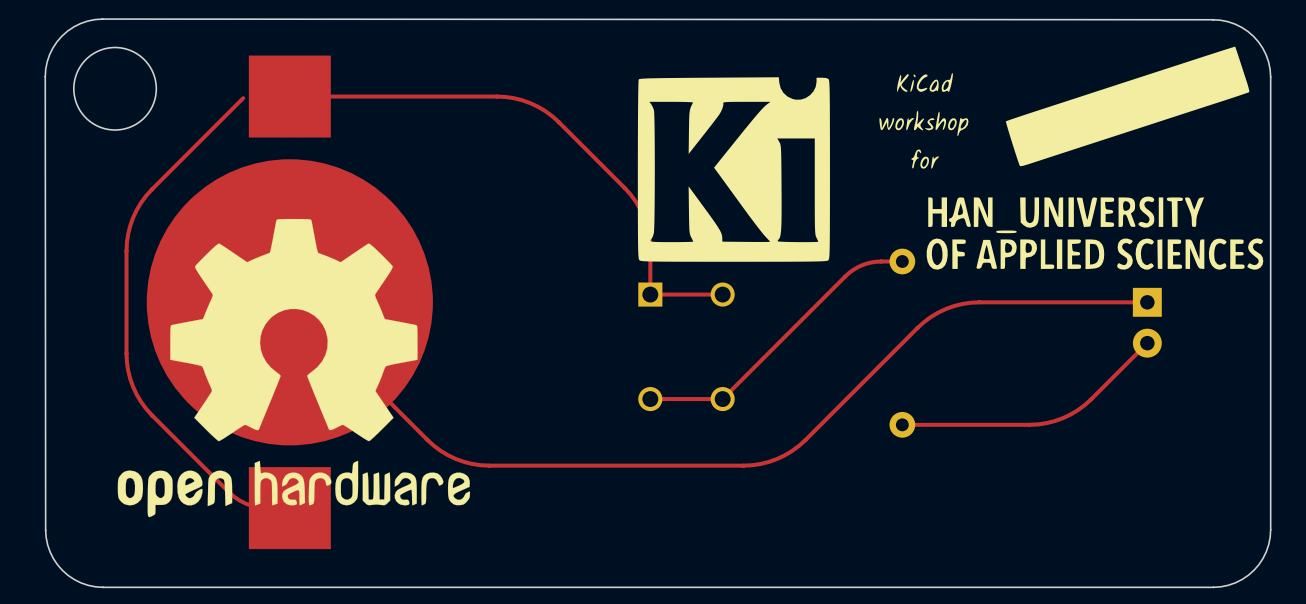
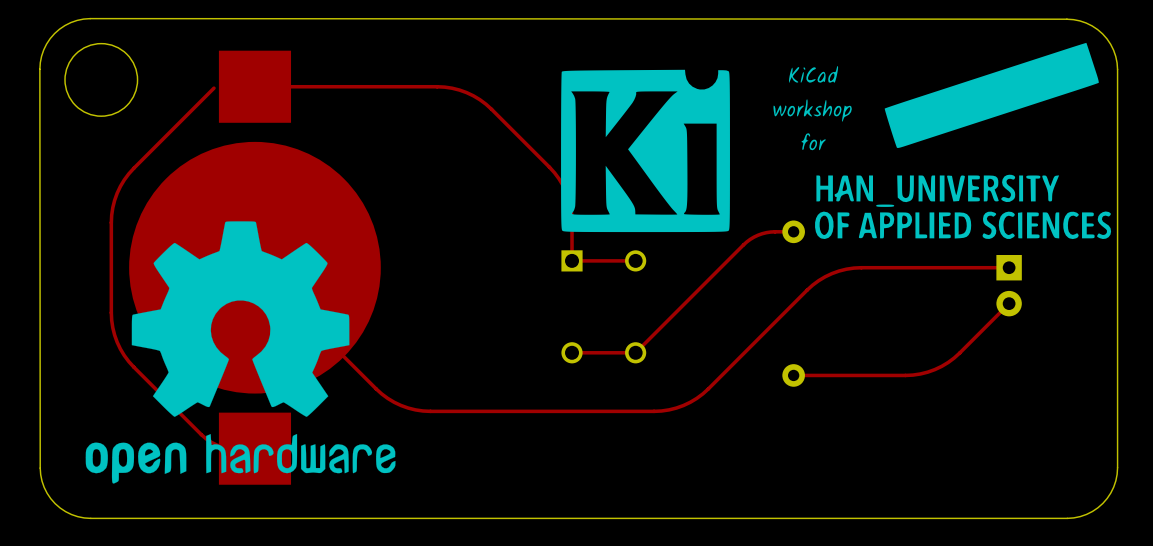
drawing position: (293, 368) -> (240, 352)

